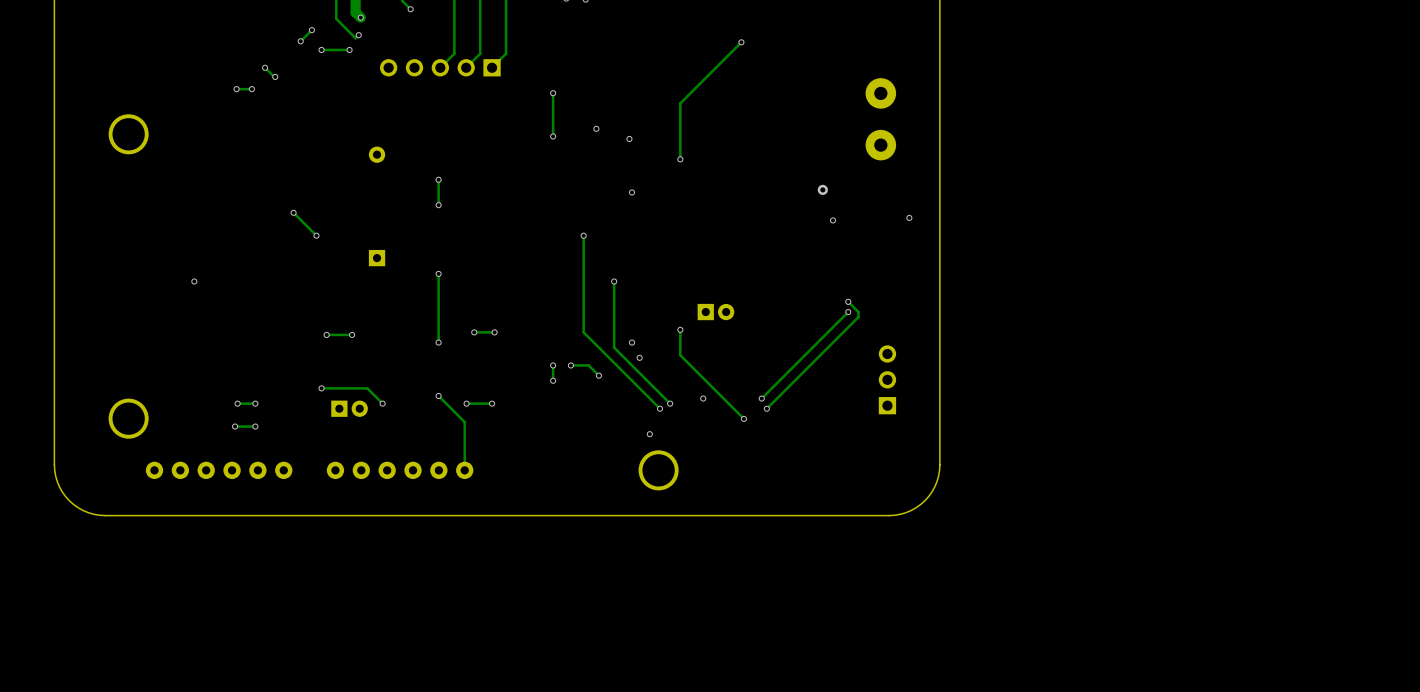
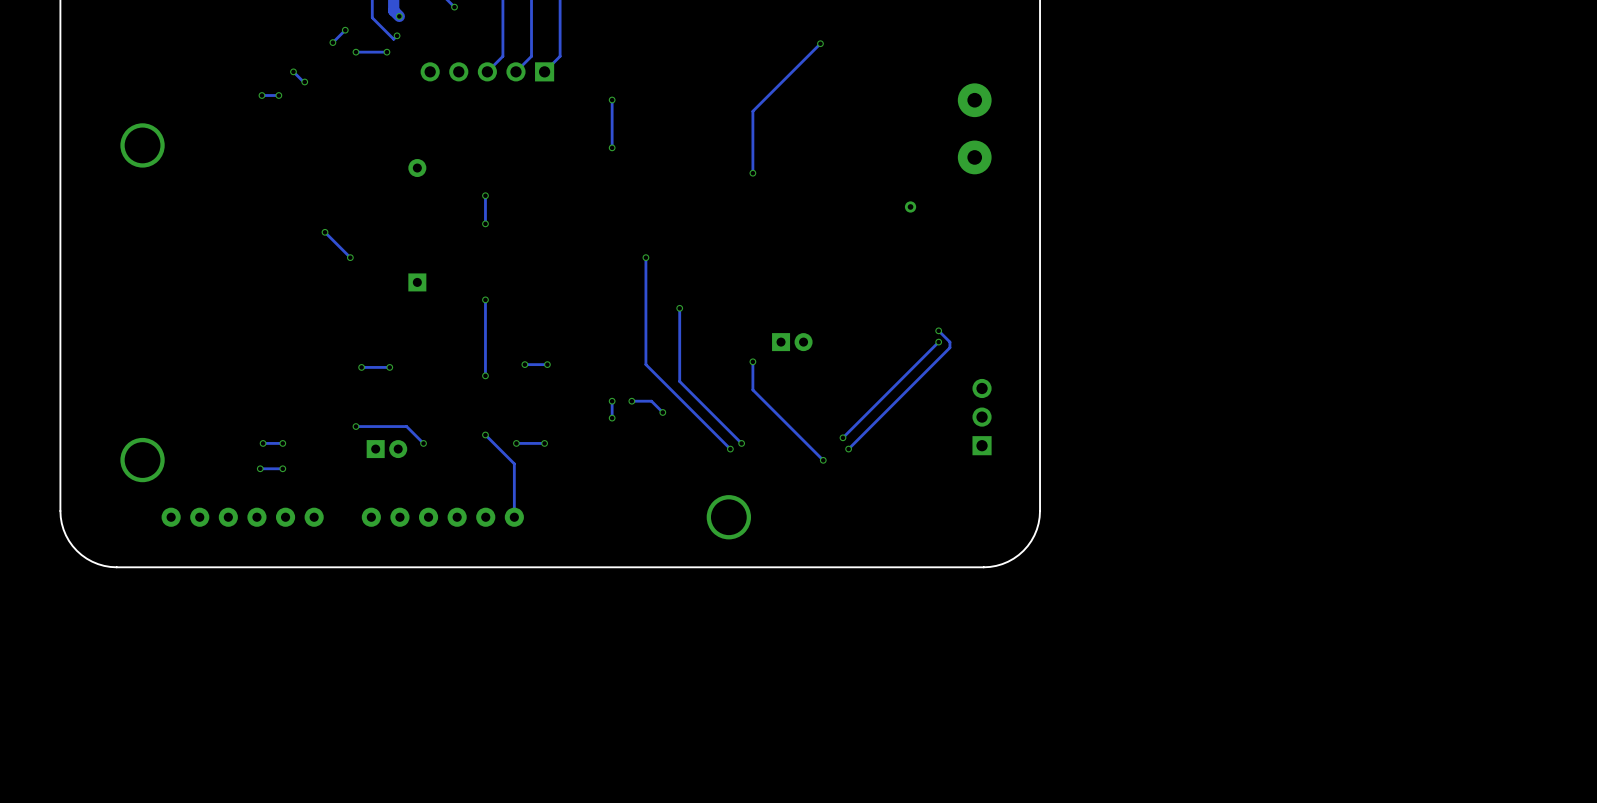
via: (596, 128) -> none
via: (629, 139) -> none
via: (632, 192) -> none
via: (909, 217) -> none
via: (833, 220) -> none
via: (194, 281) -> none
via: (632, 342) -> none
via: (639, 357) -> none
via: (703, 398) -> none
via: (649, 434) -> none

